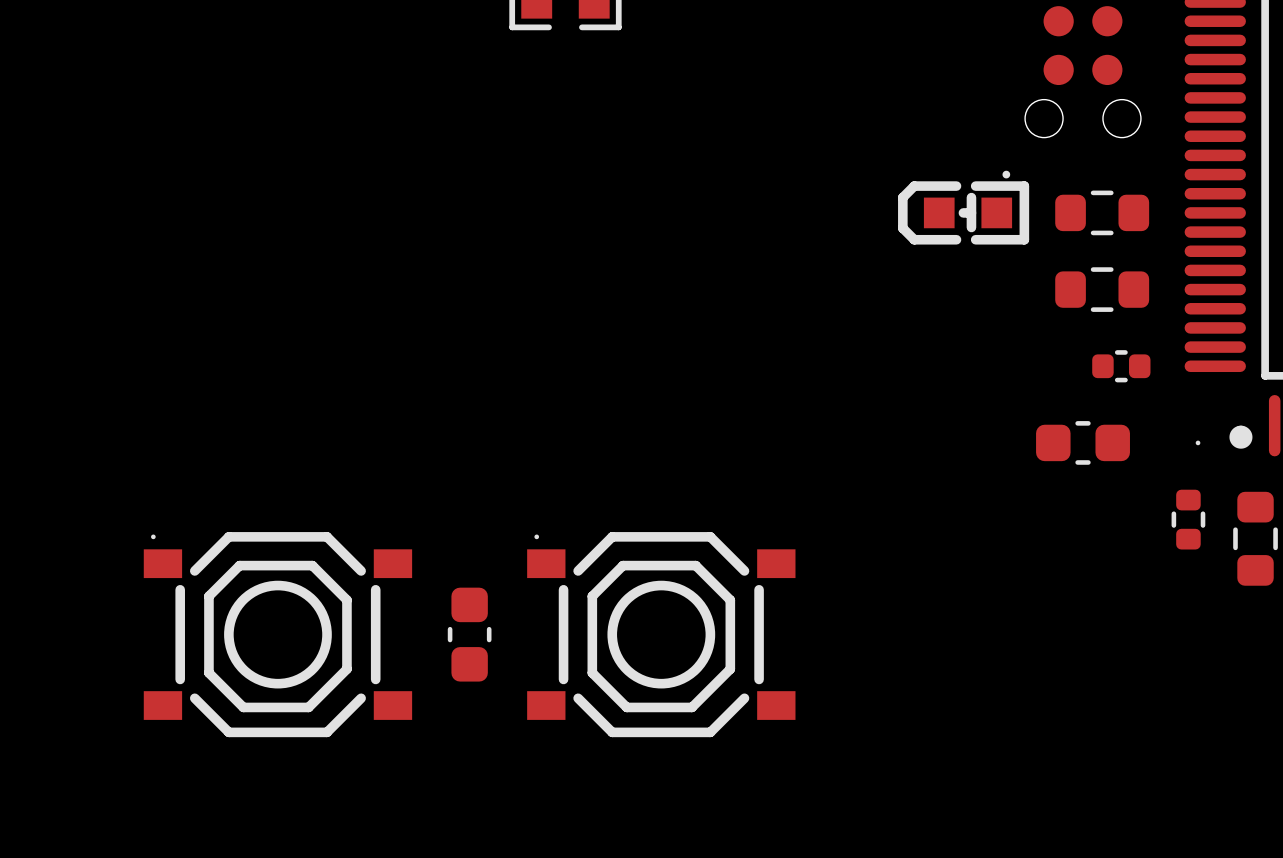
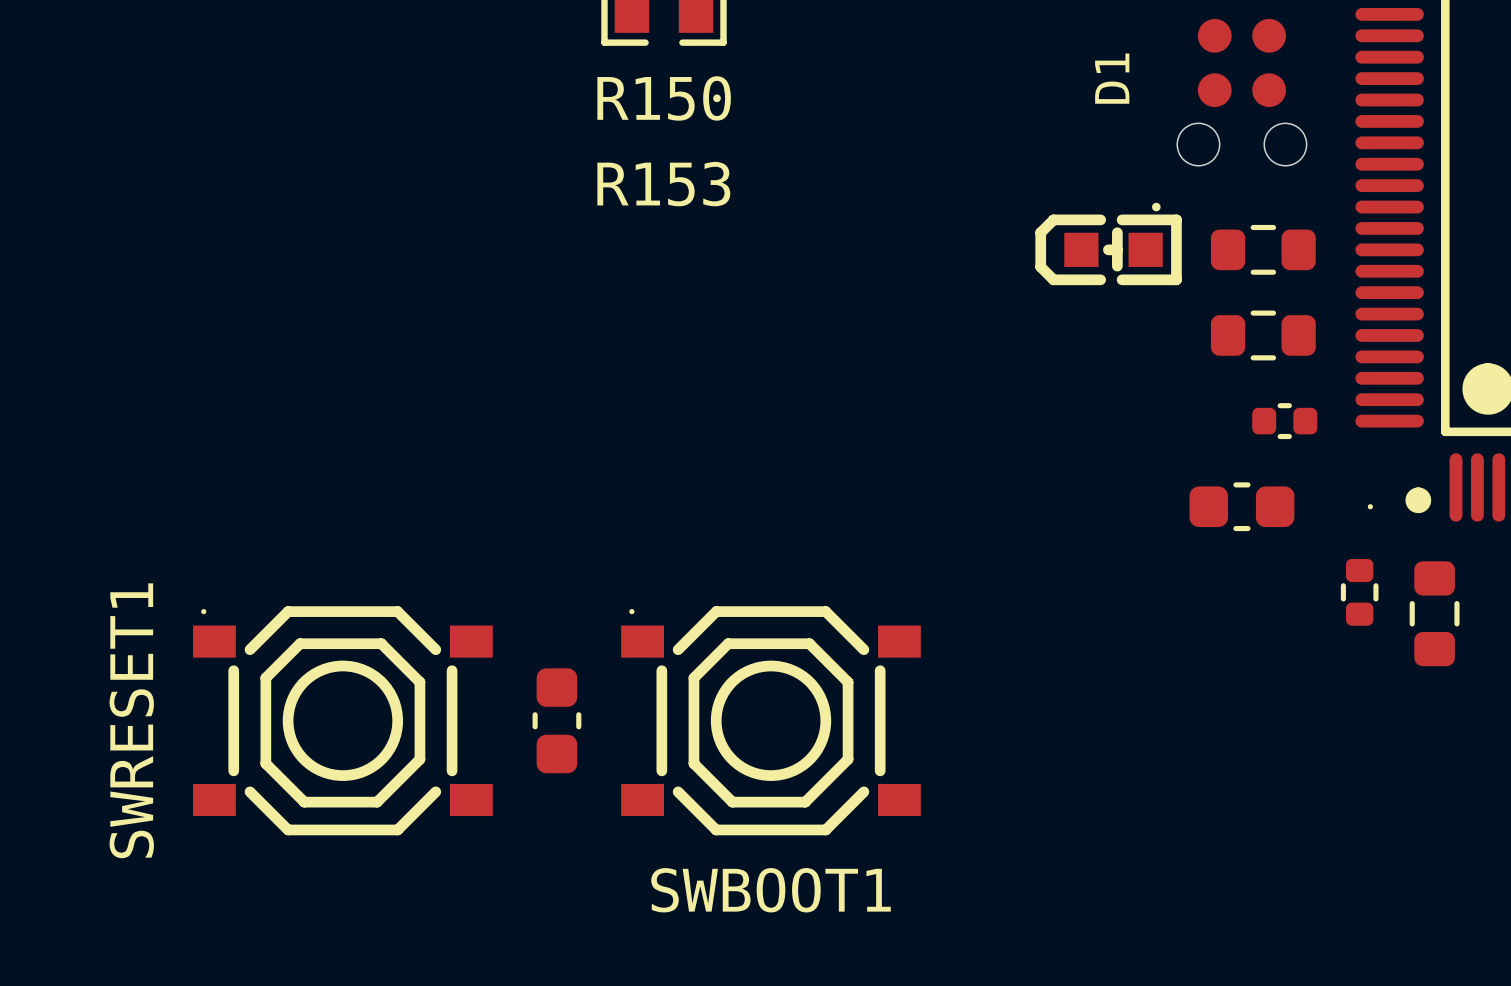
D1 name: none -> D1 (1112, 78)
R150 name: none -> R150 (664, 98)
R153 name: none -> R153 (663, 184)
SWRESET1 name: none -> SWRESET1 (131, 720)
SWBOOT1 name: none -> SWBOOT1 (771, 890)

